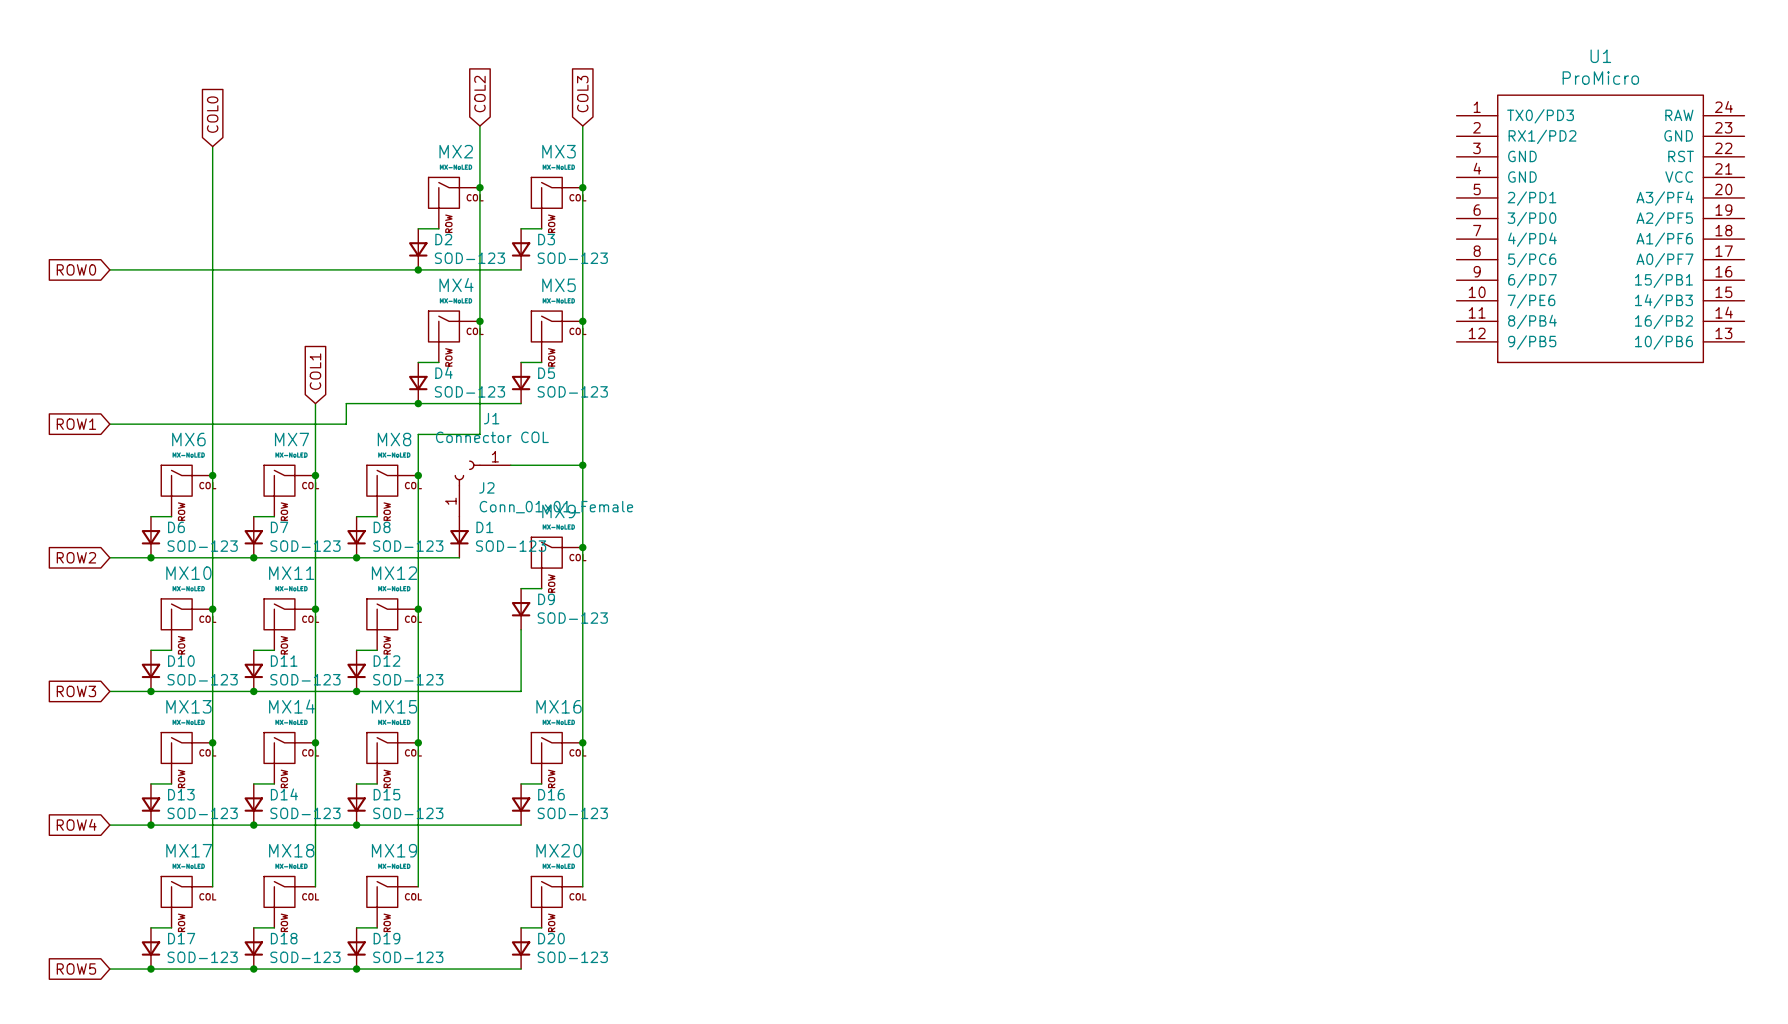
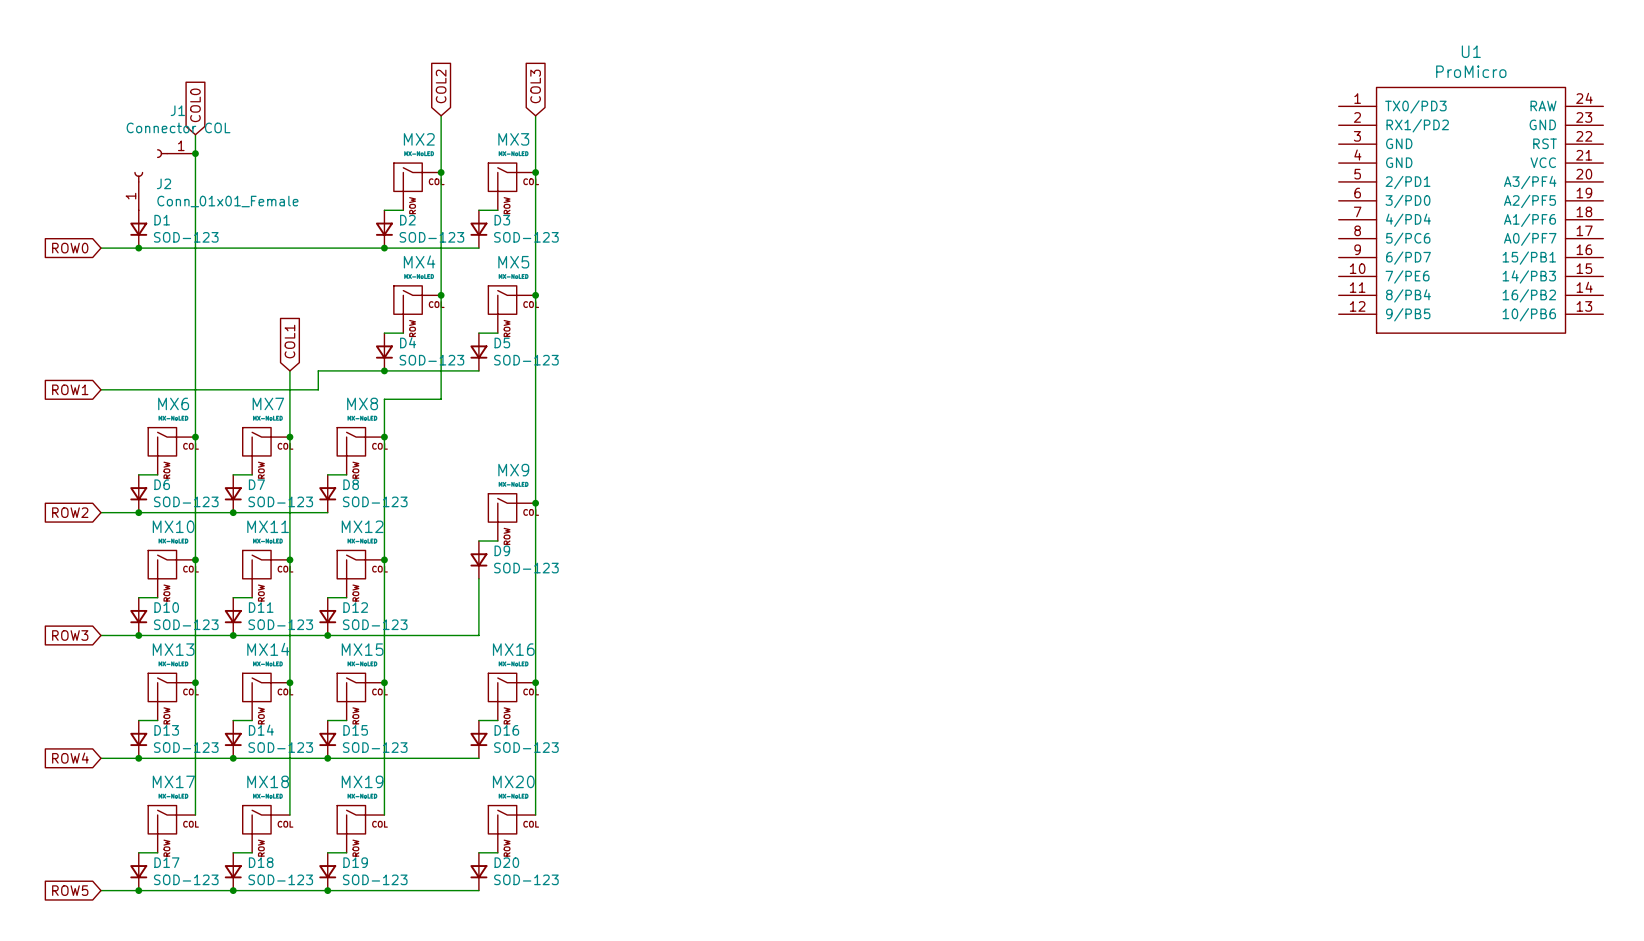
junction: none -> (195, 153)
junction: none -> (138, 248)
J1 position: (489, 465) -> (176, 153)
wire: (510, 465) (582, 465) -> none
junction: (582, 465) -> none
J2 position: (459, 495) -> (138, 191)
D1 position: (459, 537) -> (138, 229)
wire: (356, 557) (459, 557) -> none
junction: (356, 557) -> none

